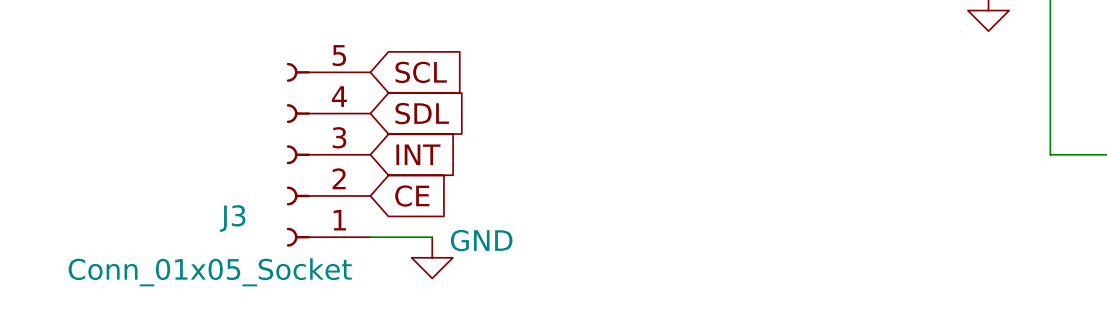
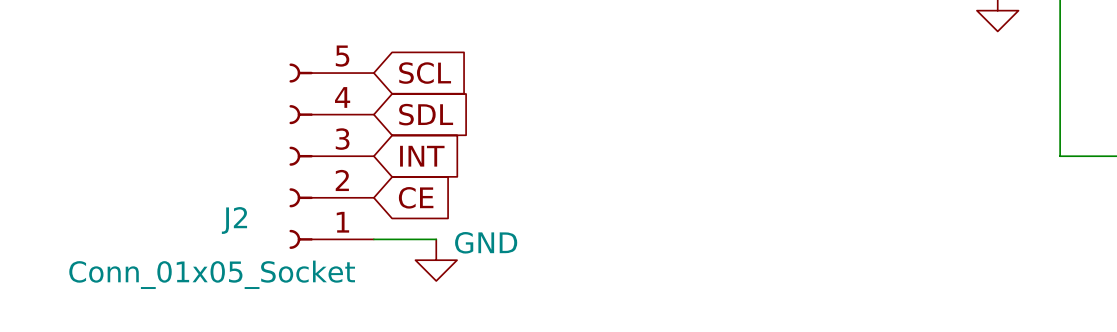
J3 name: J3 (232, 218) -> J2 (234, 220)

